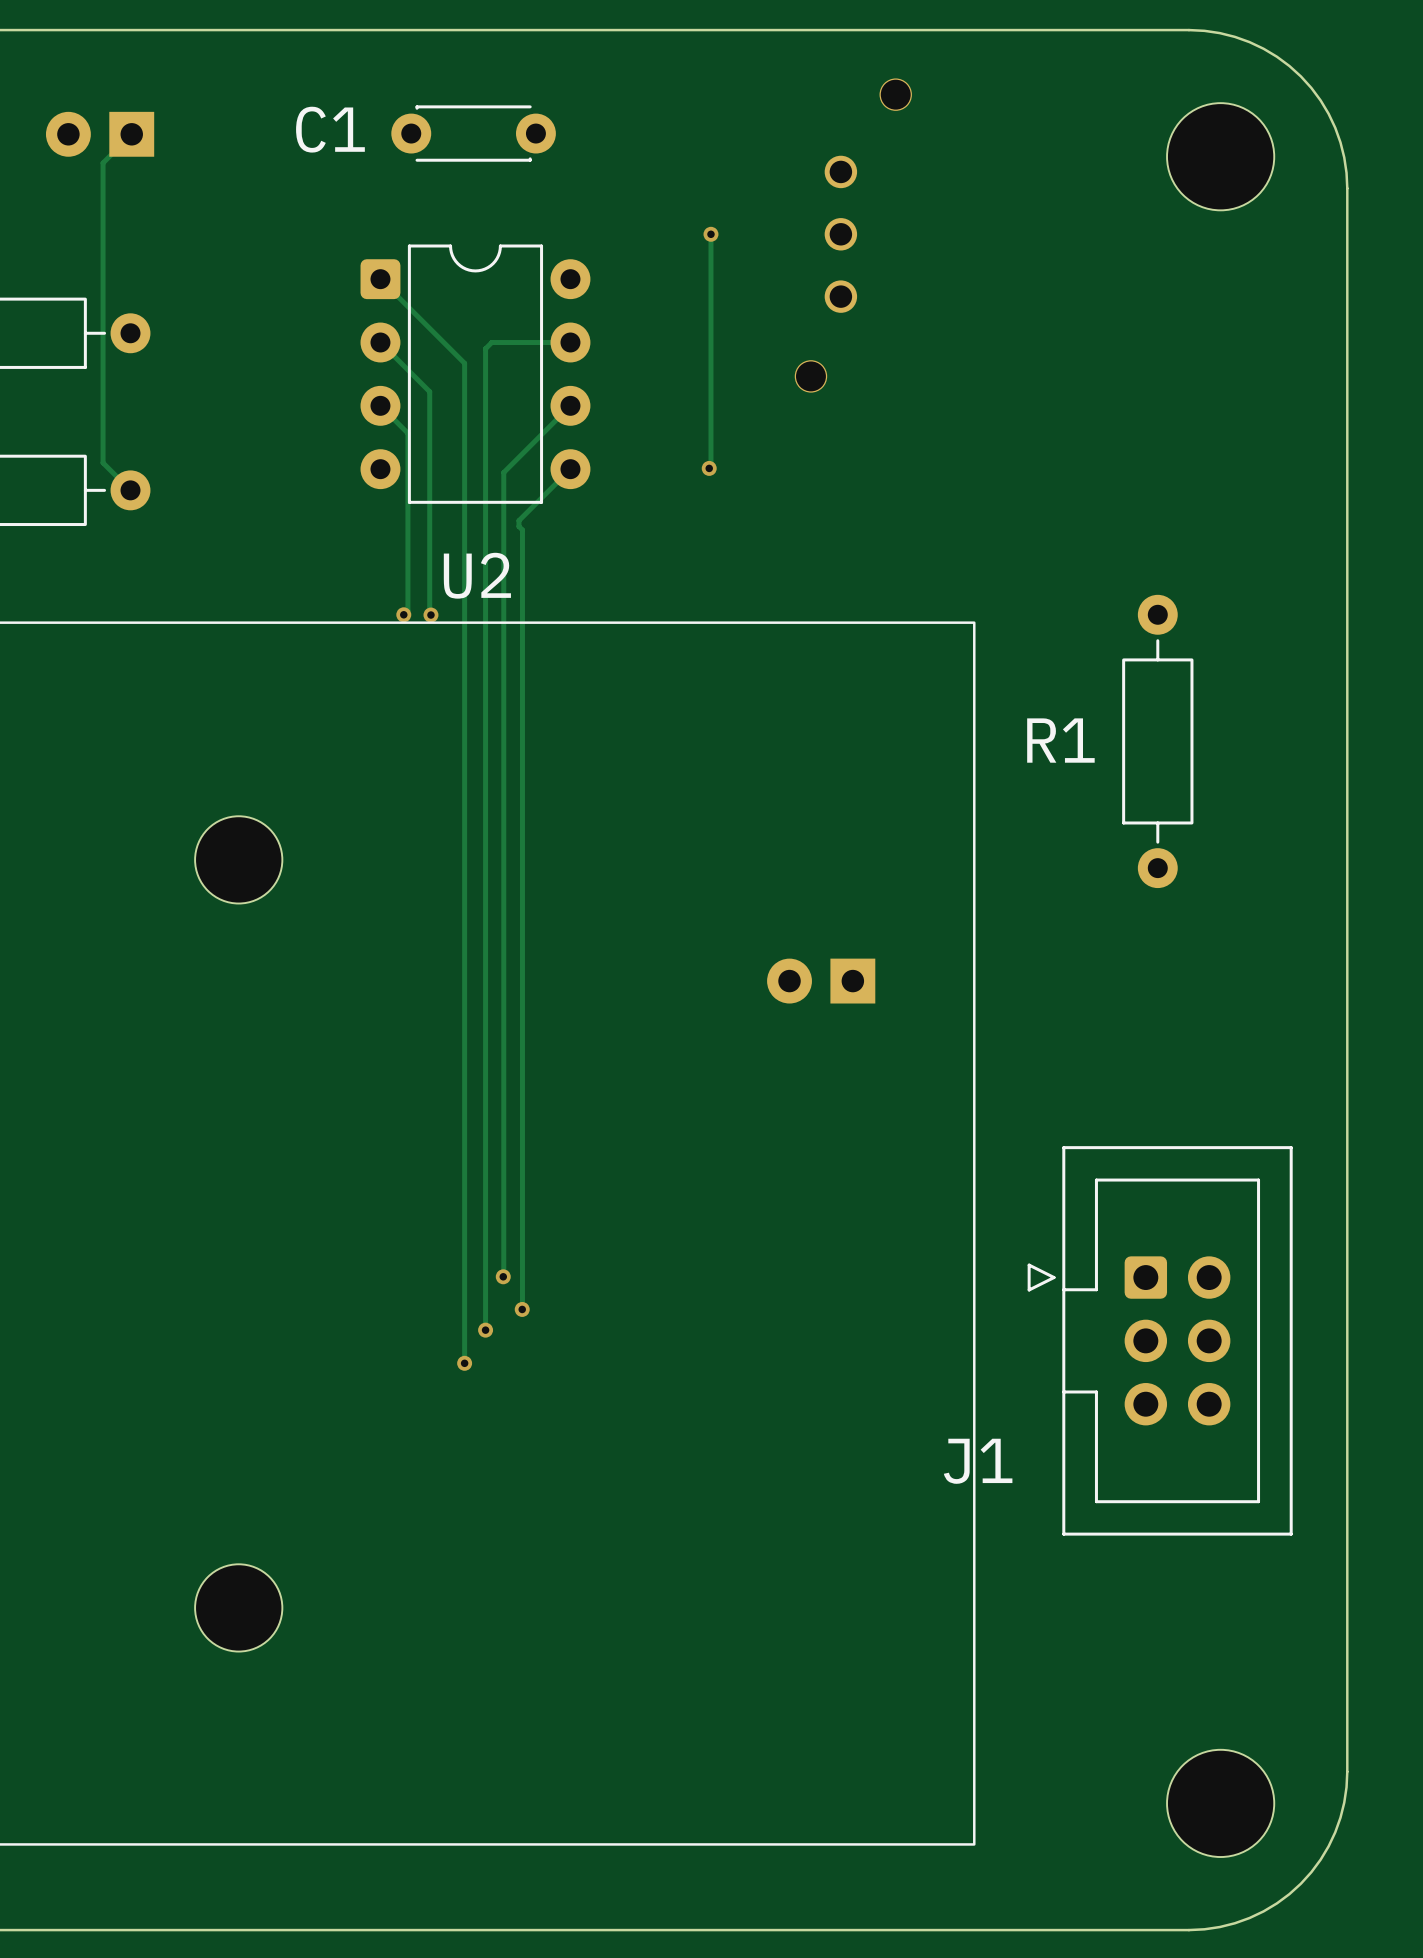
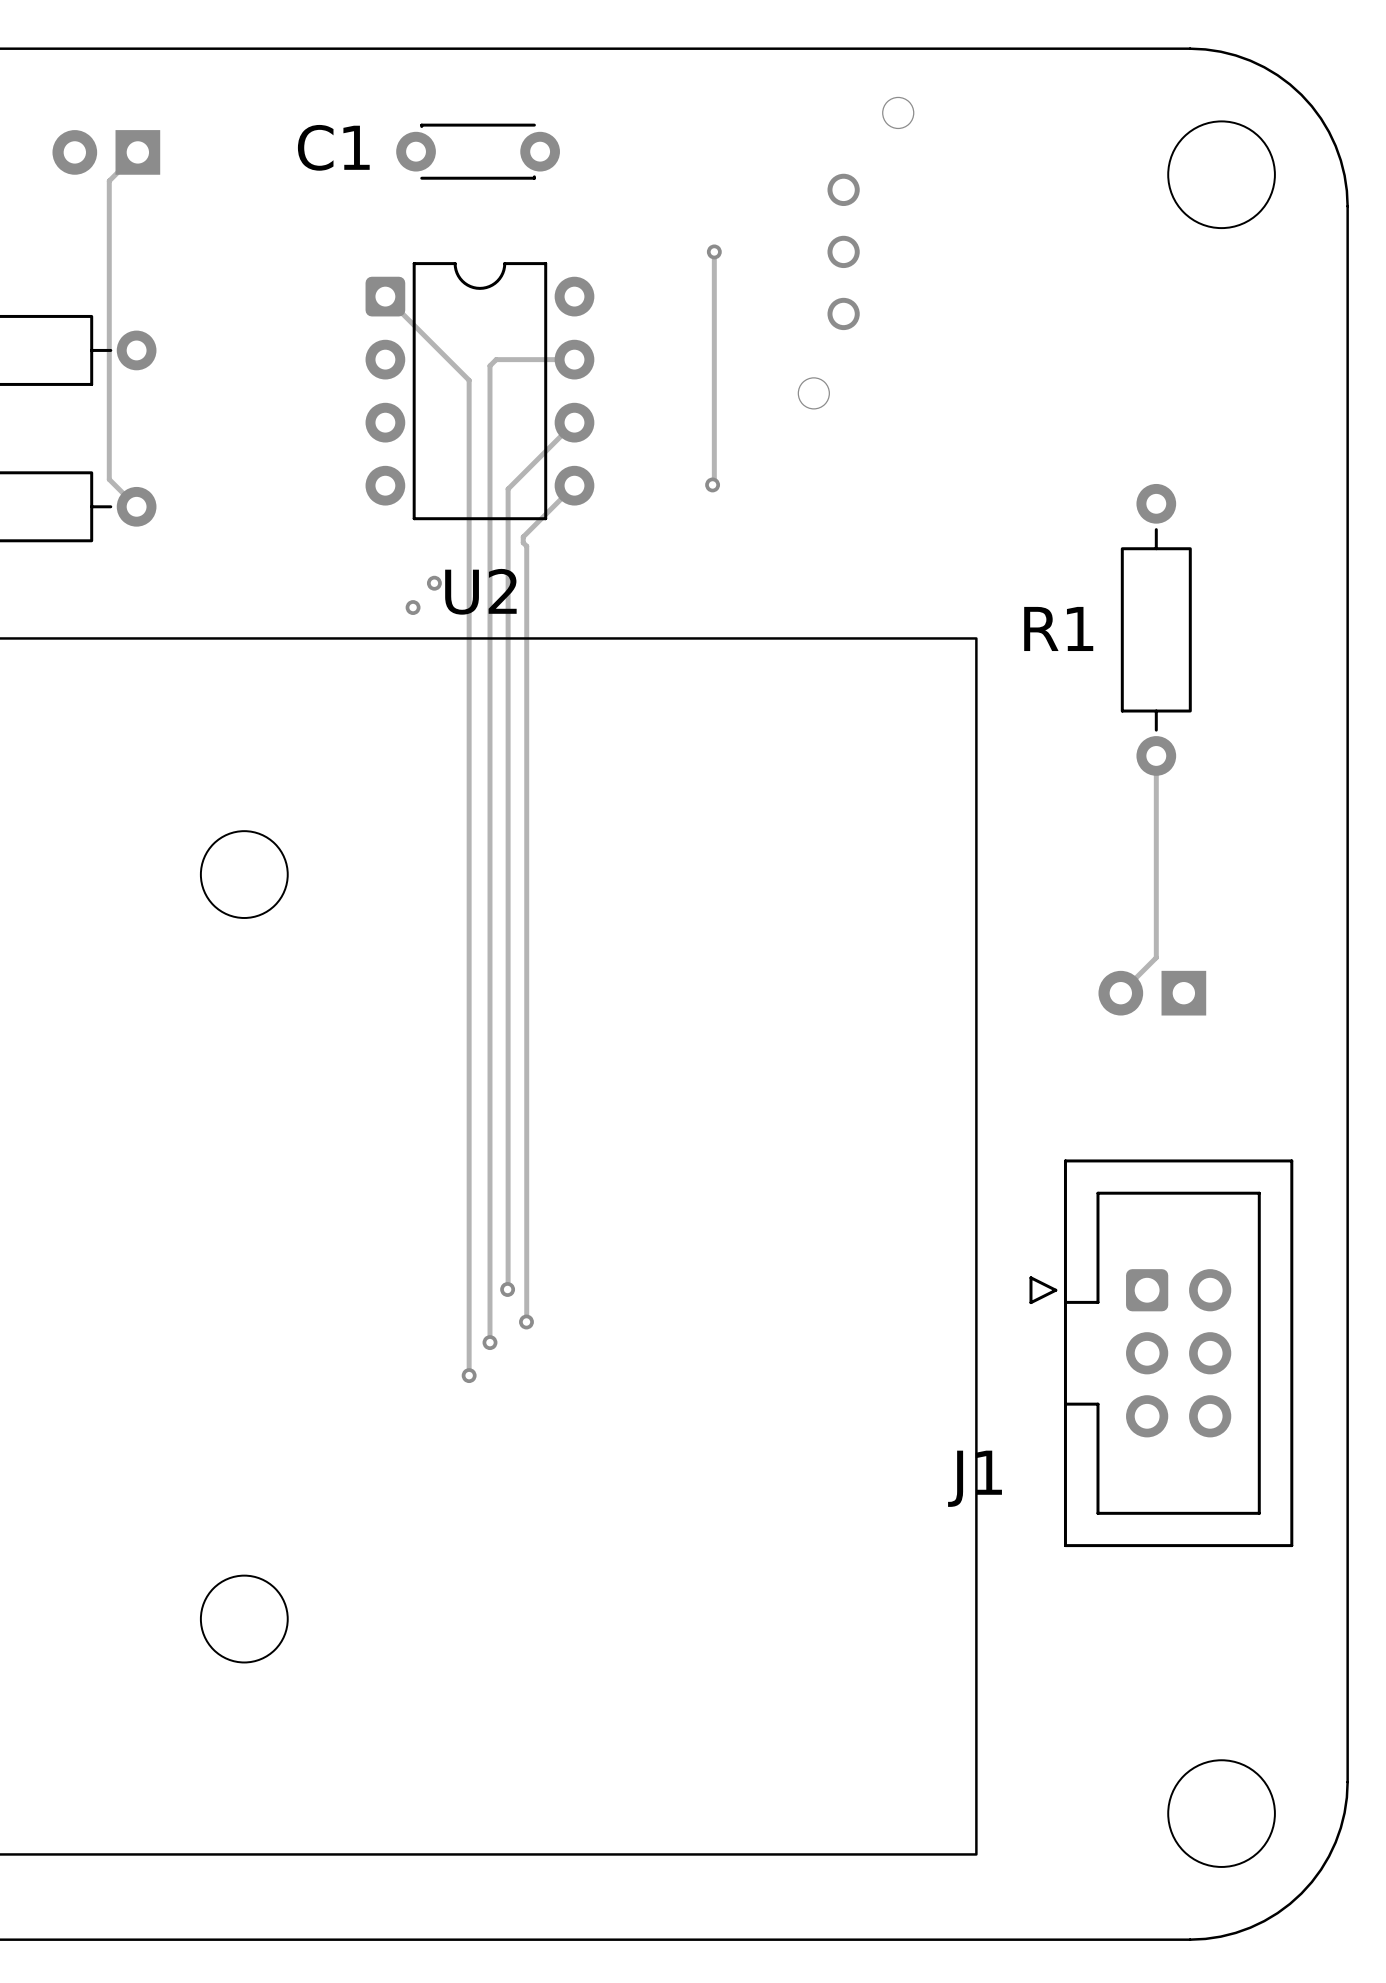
track: (380, 342) (429, 391) (430, 615) -> none
track: (380, 405) (407, 433) (407, 610) (403, 614) -> none
via: none -> (434, 583)
via: none -> (413, 607)
via: (403, 614) -> none
via: (430, 615) -> none
track: none -> (1156, 755) (1156, 957) (1120, 993)
R1 position: (1157, 741) -> (1156, 629)
part position: (821, 981) -> (1152, 993)

